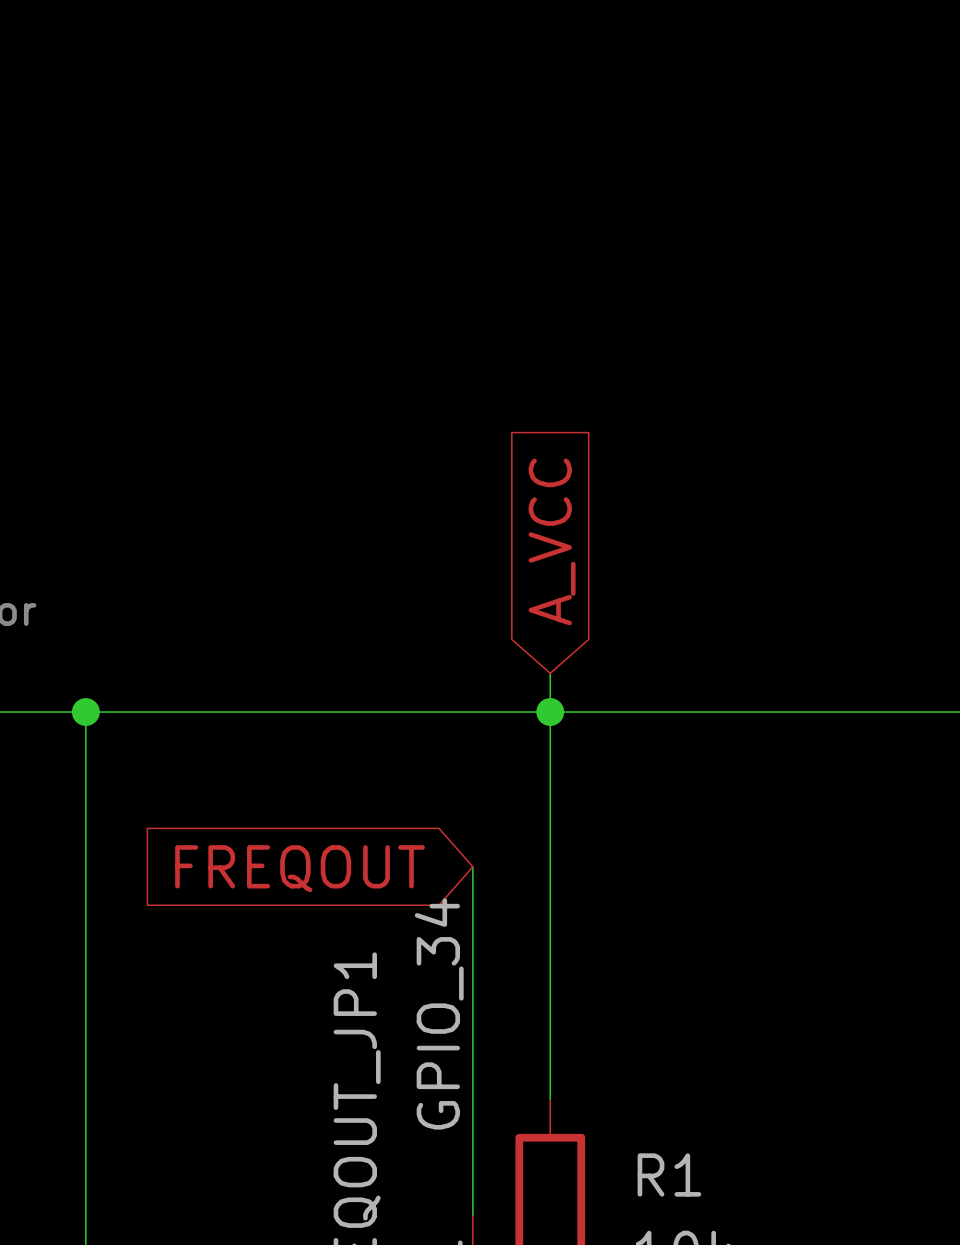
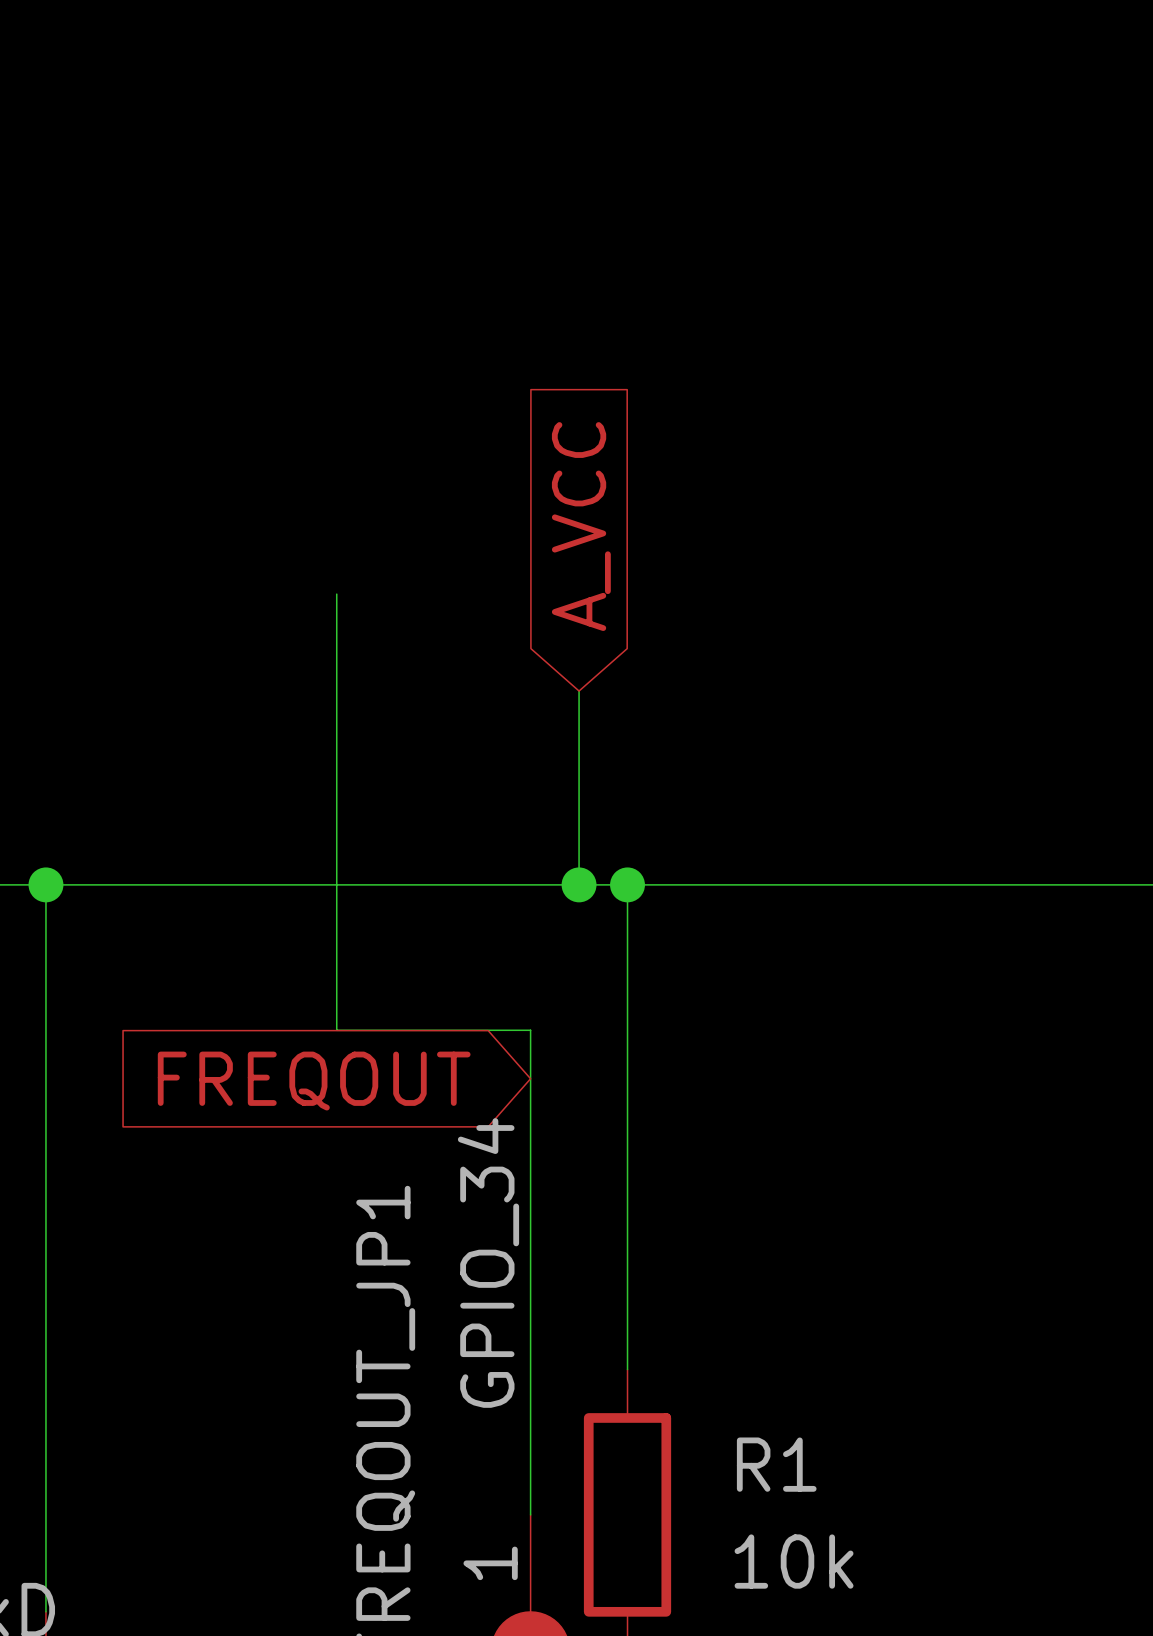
wire: none -> (336, 594) (336, 1030) (530, 1030) (530, 1078)
global label position: A_VCC (552, 541) -> A_VCC (581, 526)
wire: none -> (579, 691) (579, 884)
wire: (550, 673) (550, 712) -> none
junction: none -> (579, 884)

